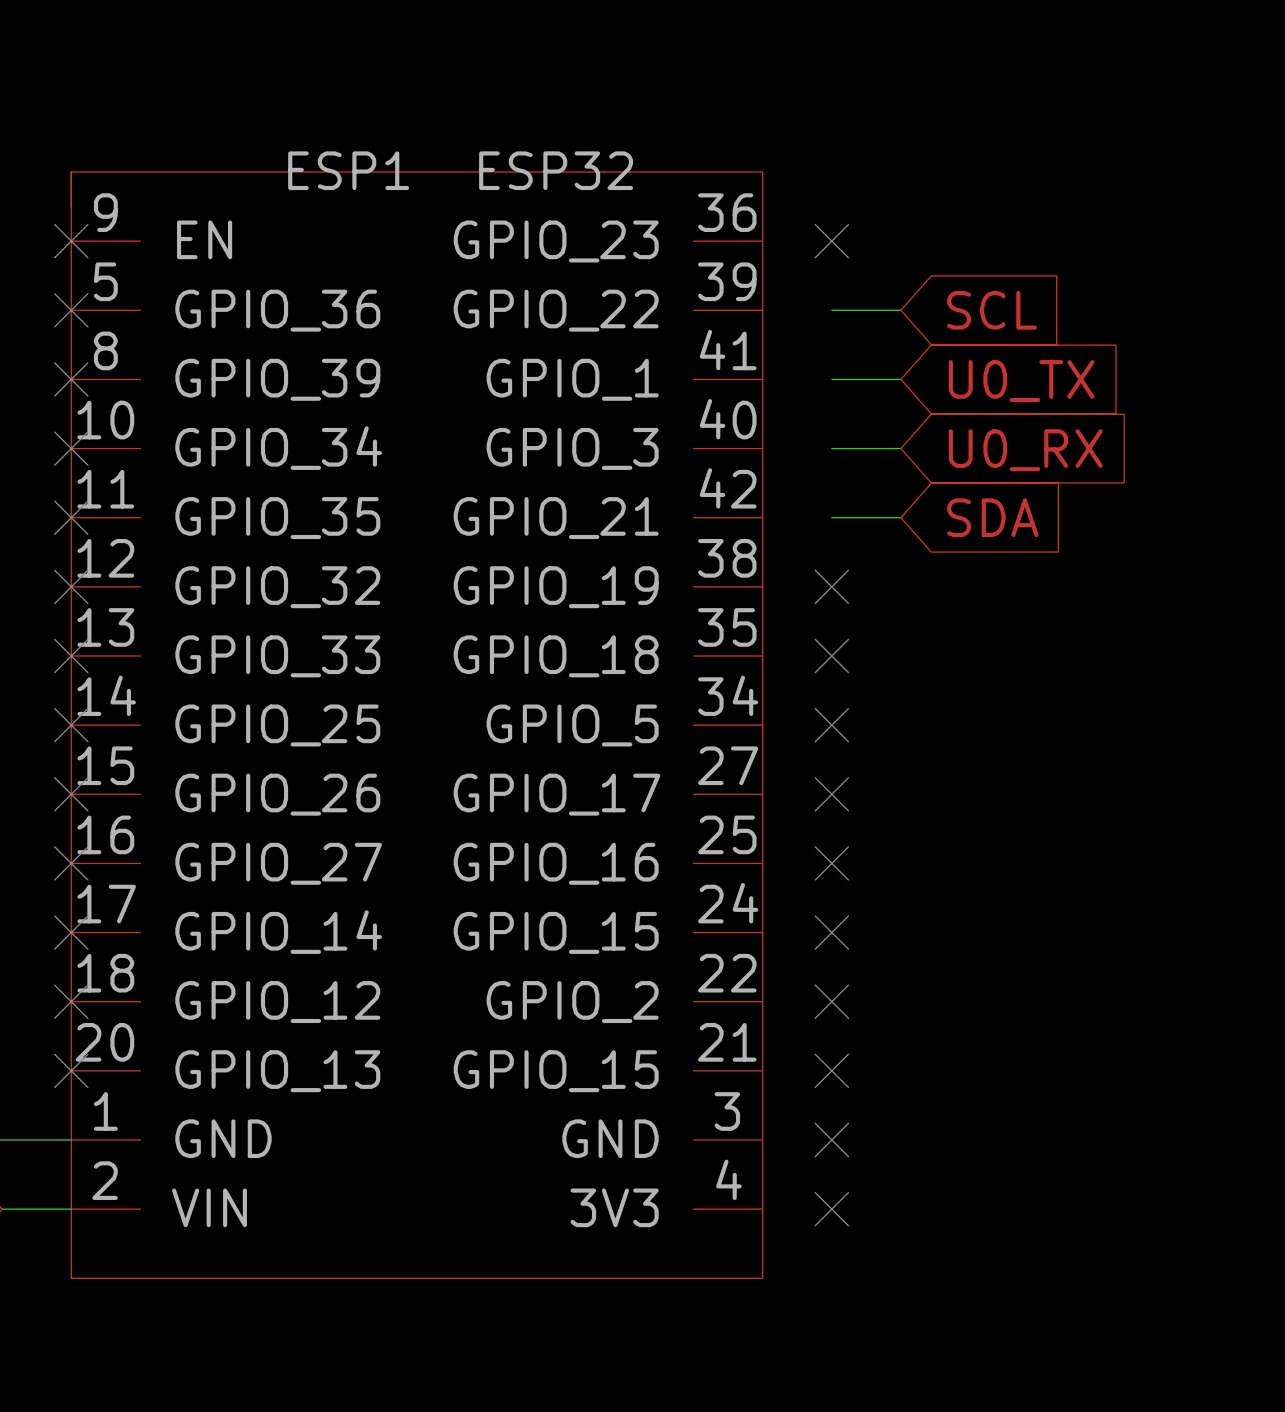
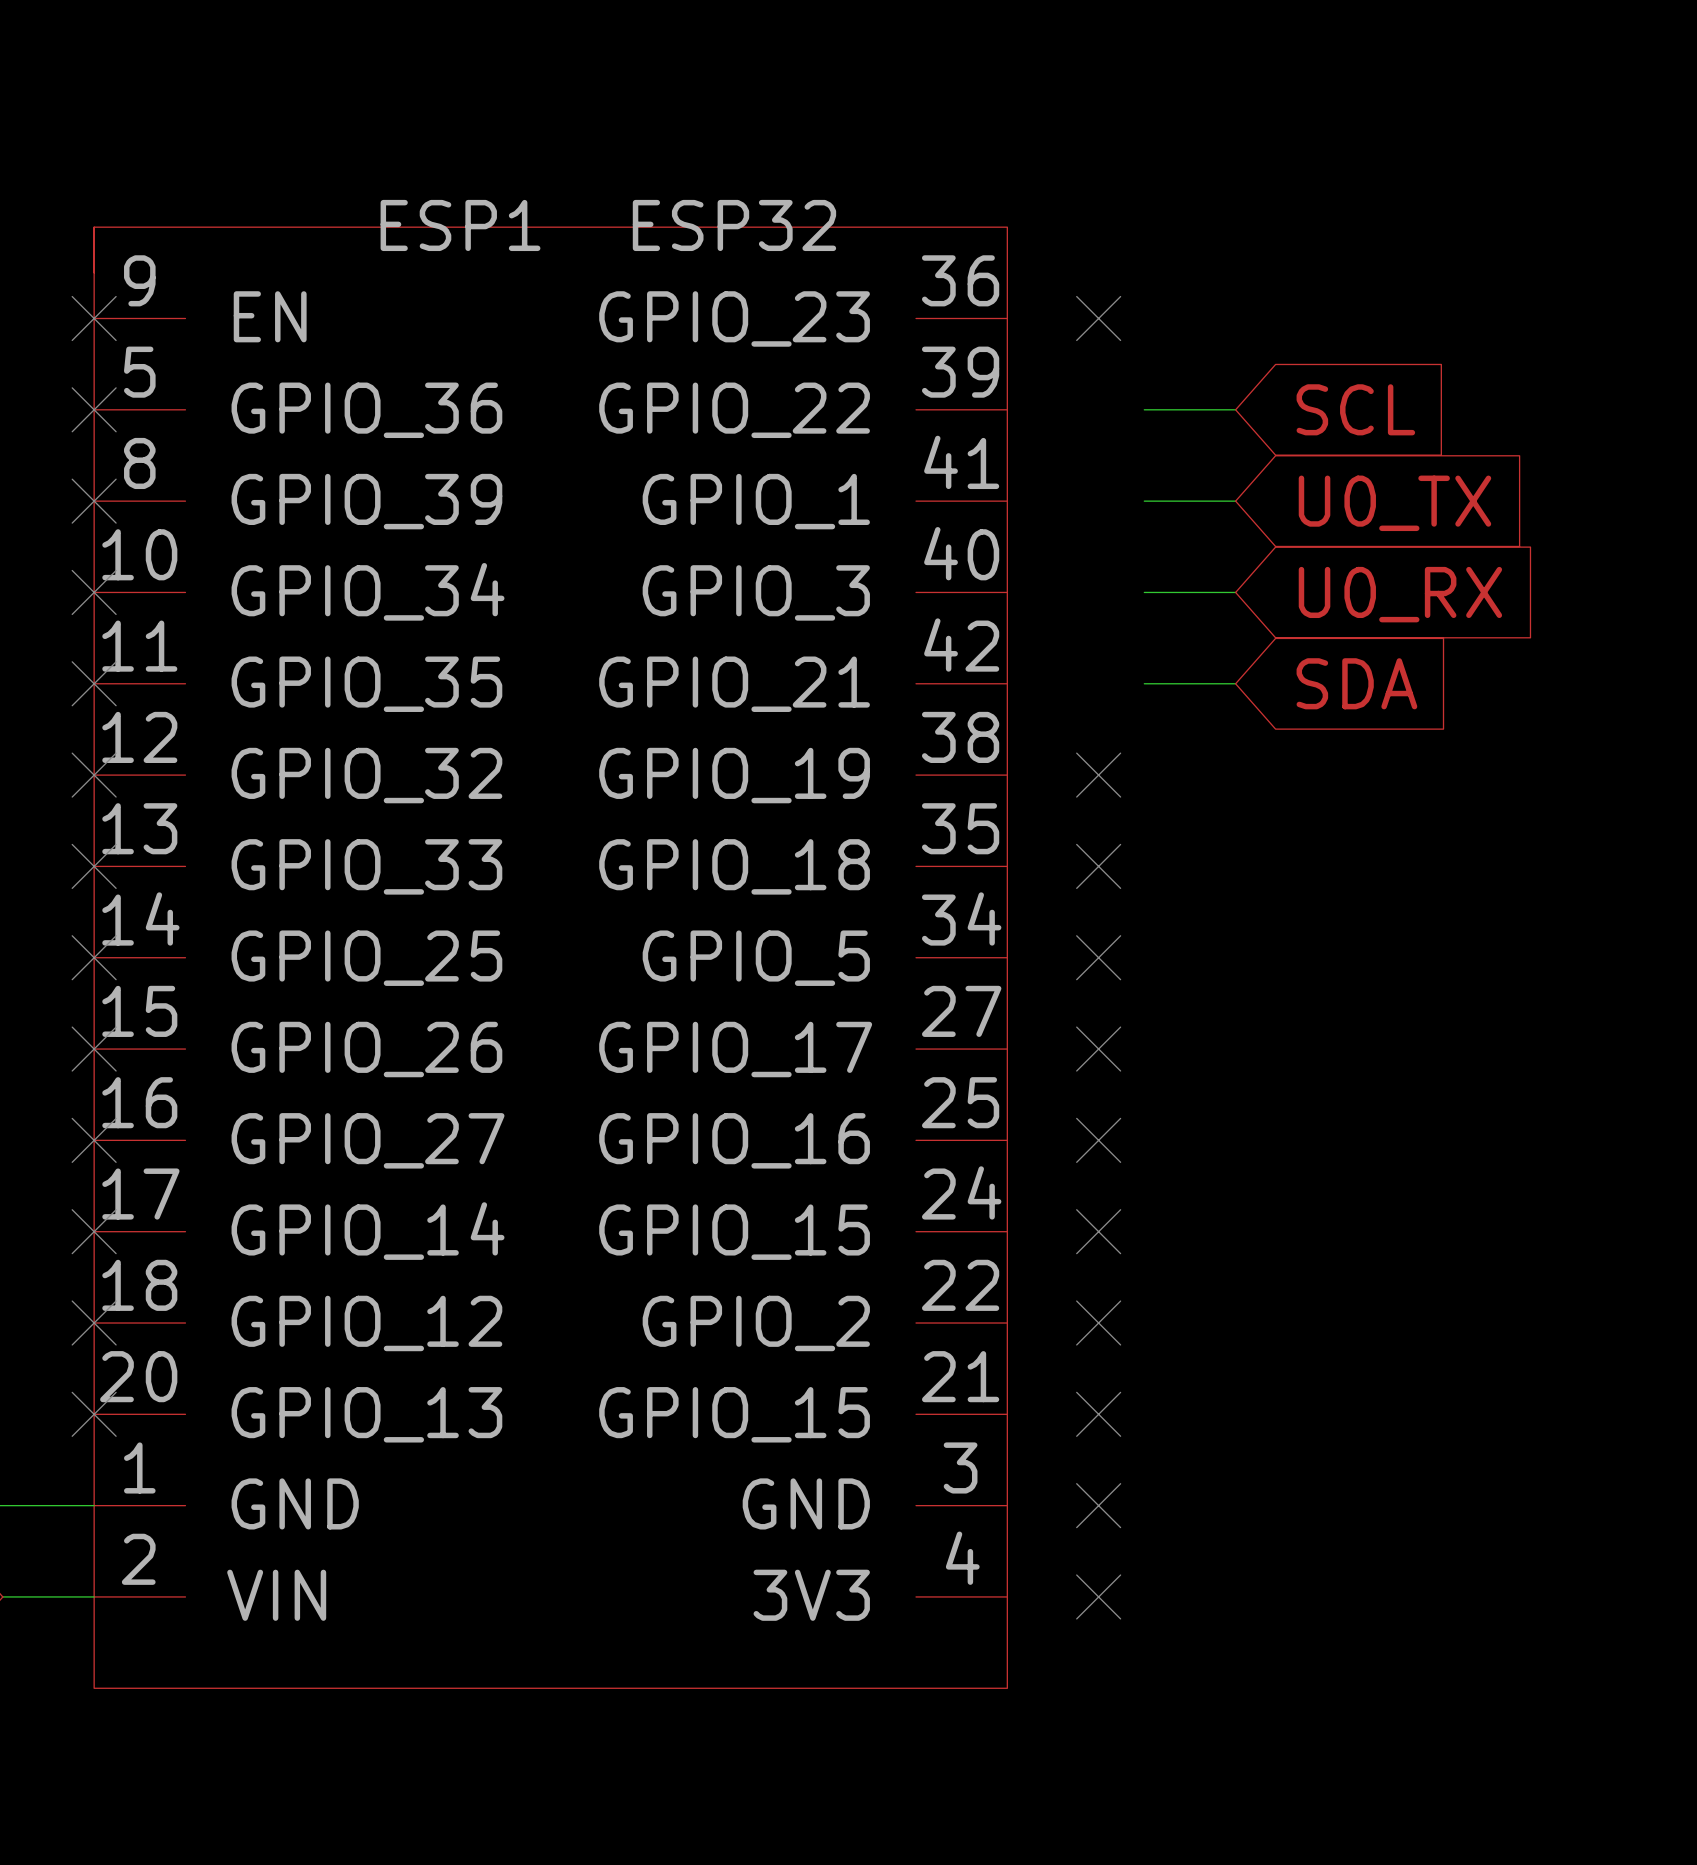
wire: (831, 310) (866, 310) -> (1189, 409) (1235, 409)
global label position: SCL (991, 310) -> SCL (1355, 409)
wire: (831, 379) (866, 379) -> (1189, 501) (1235, 501)
global label position: U0_TX (1021, 381) -> U0_TX (1394, 503)
wire: (831, 448) (866, 448) -> (1189, 592) (1235, 592)
global label position: U0_RX (1025, 450) -> U0_RX (1400, 594)
wire: (831, 517) (866, 517) -> (1189, 683) (1235, 683)
global label position: SDA (992, 517) -> SDA (1356, 683)

